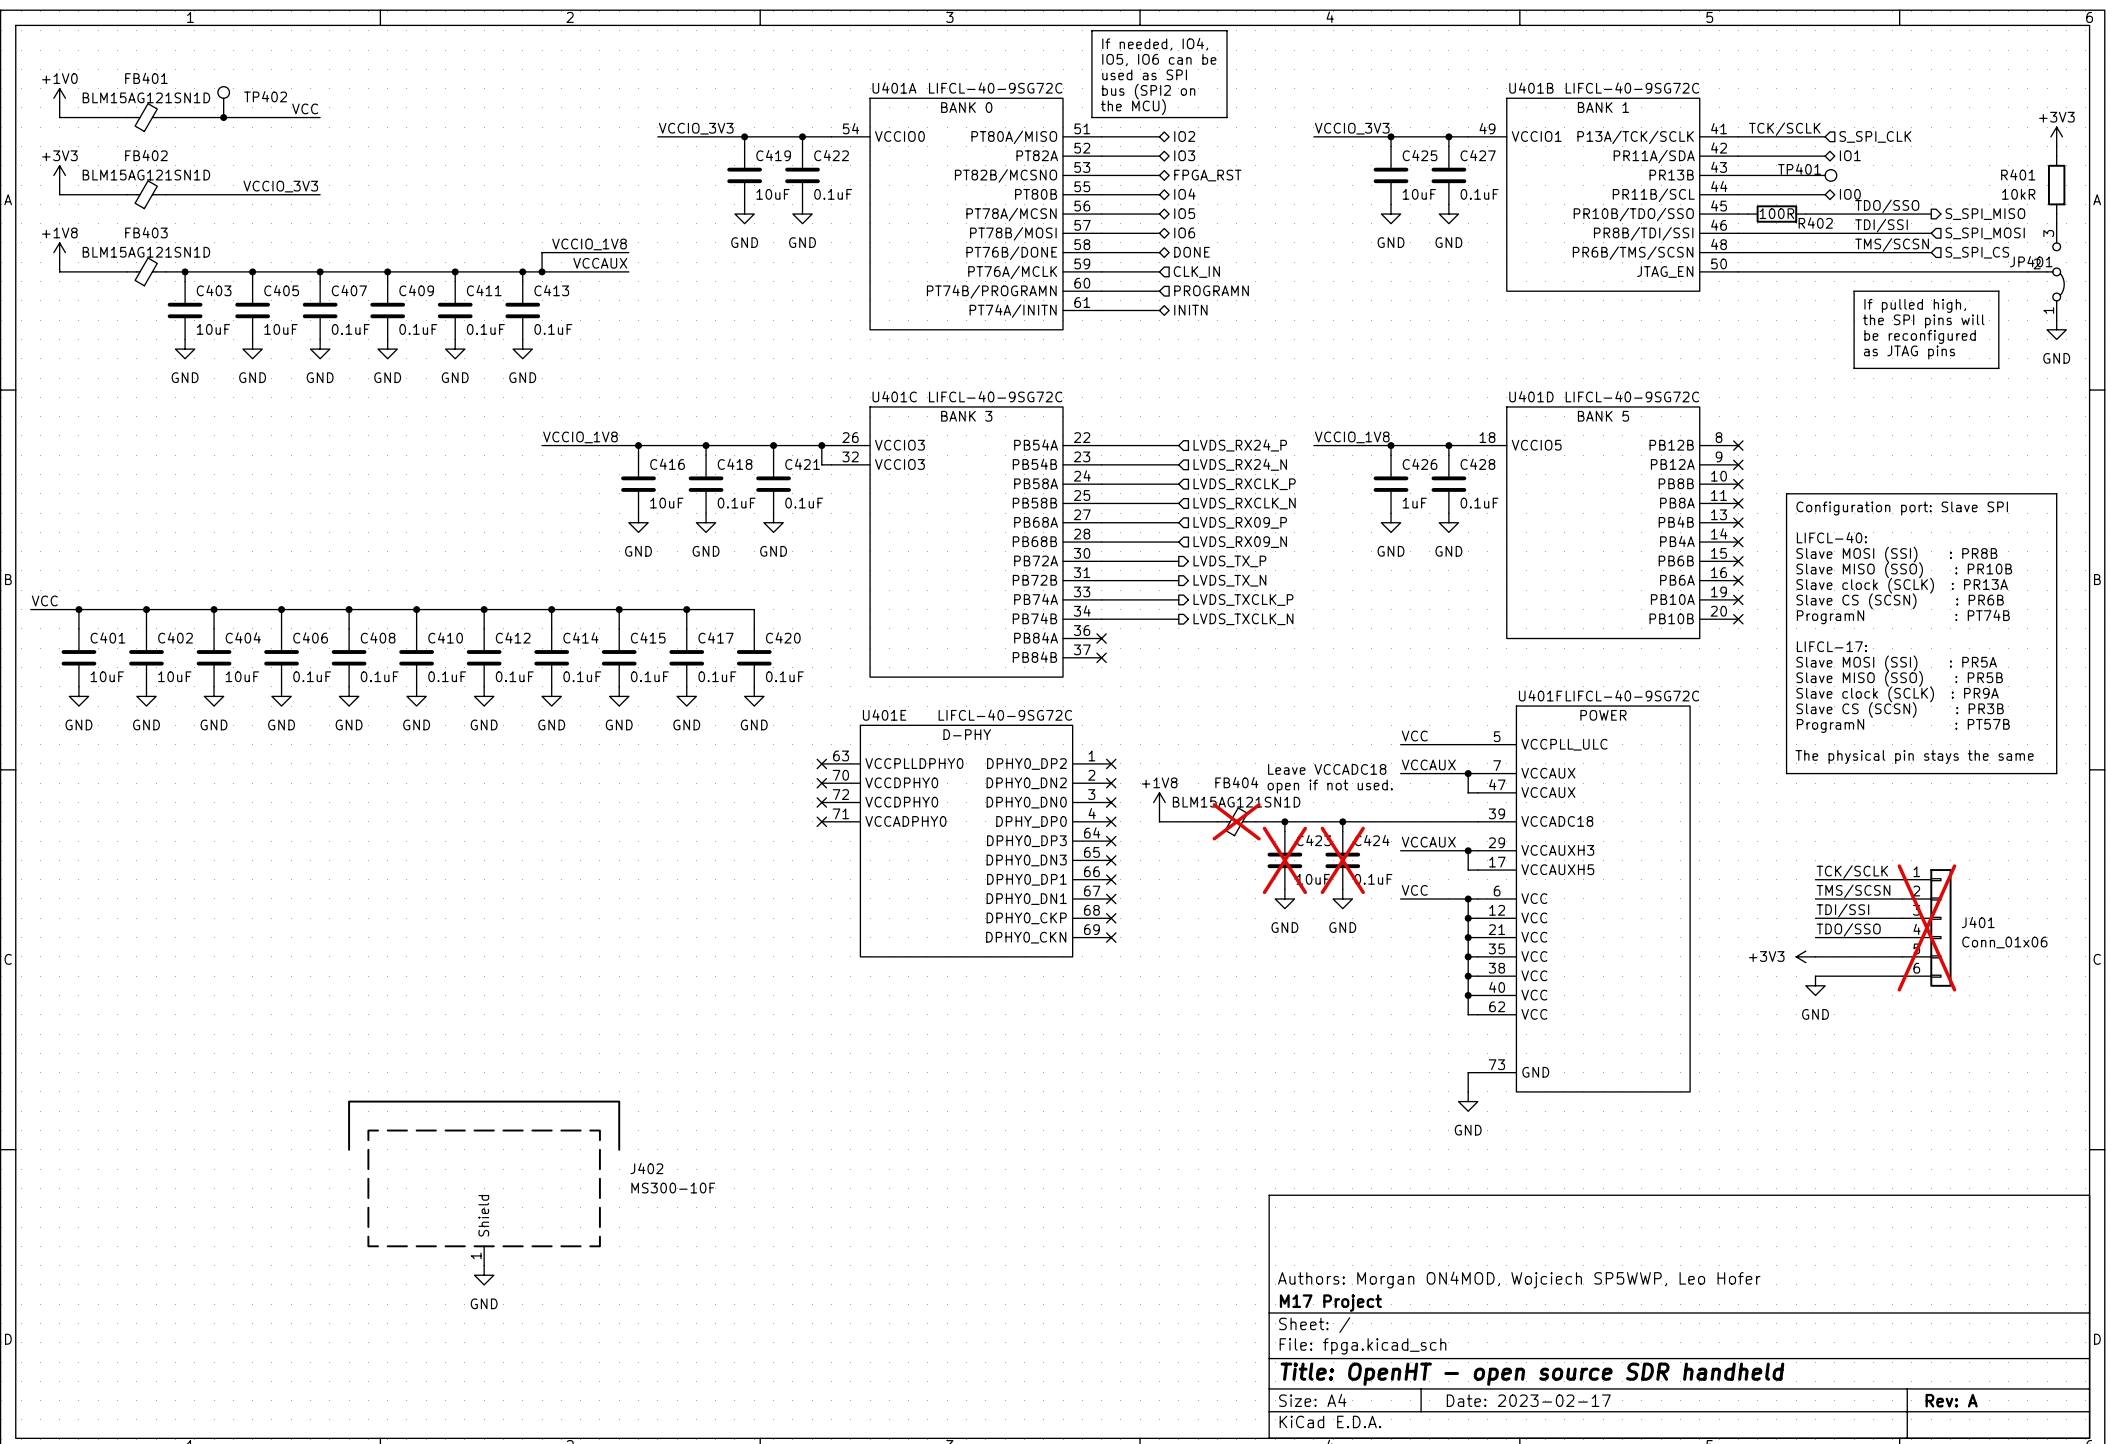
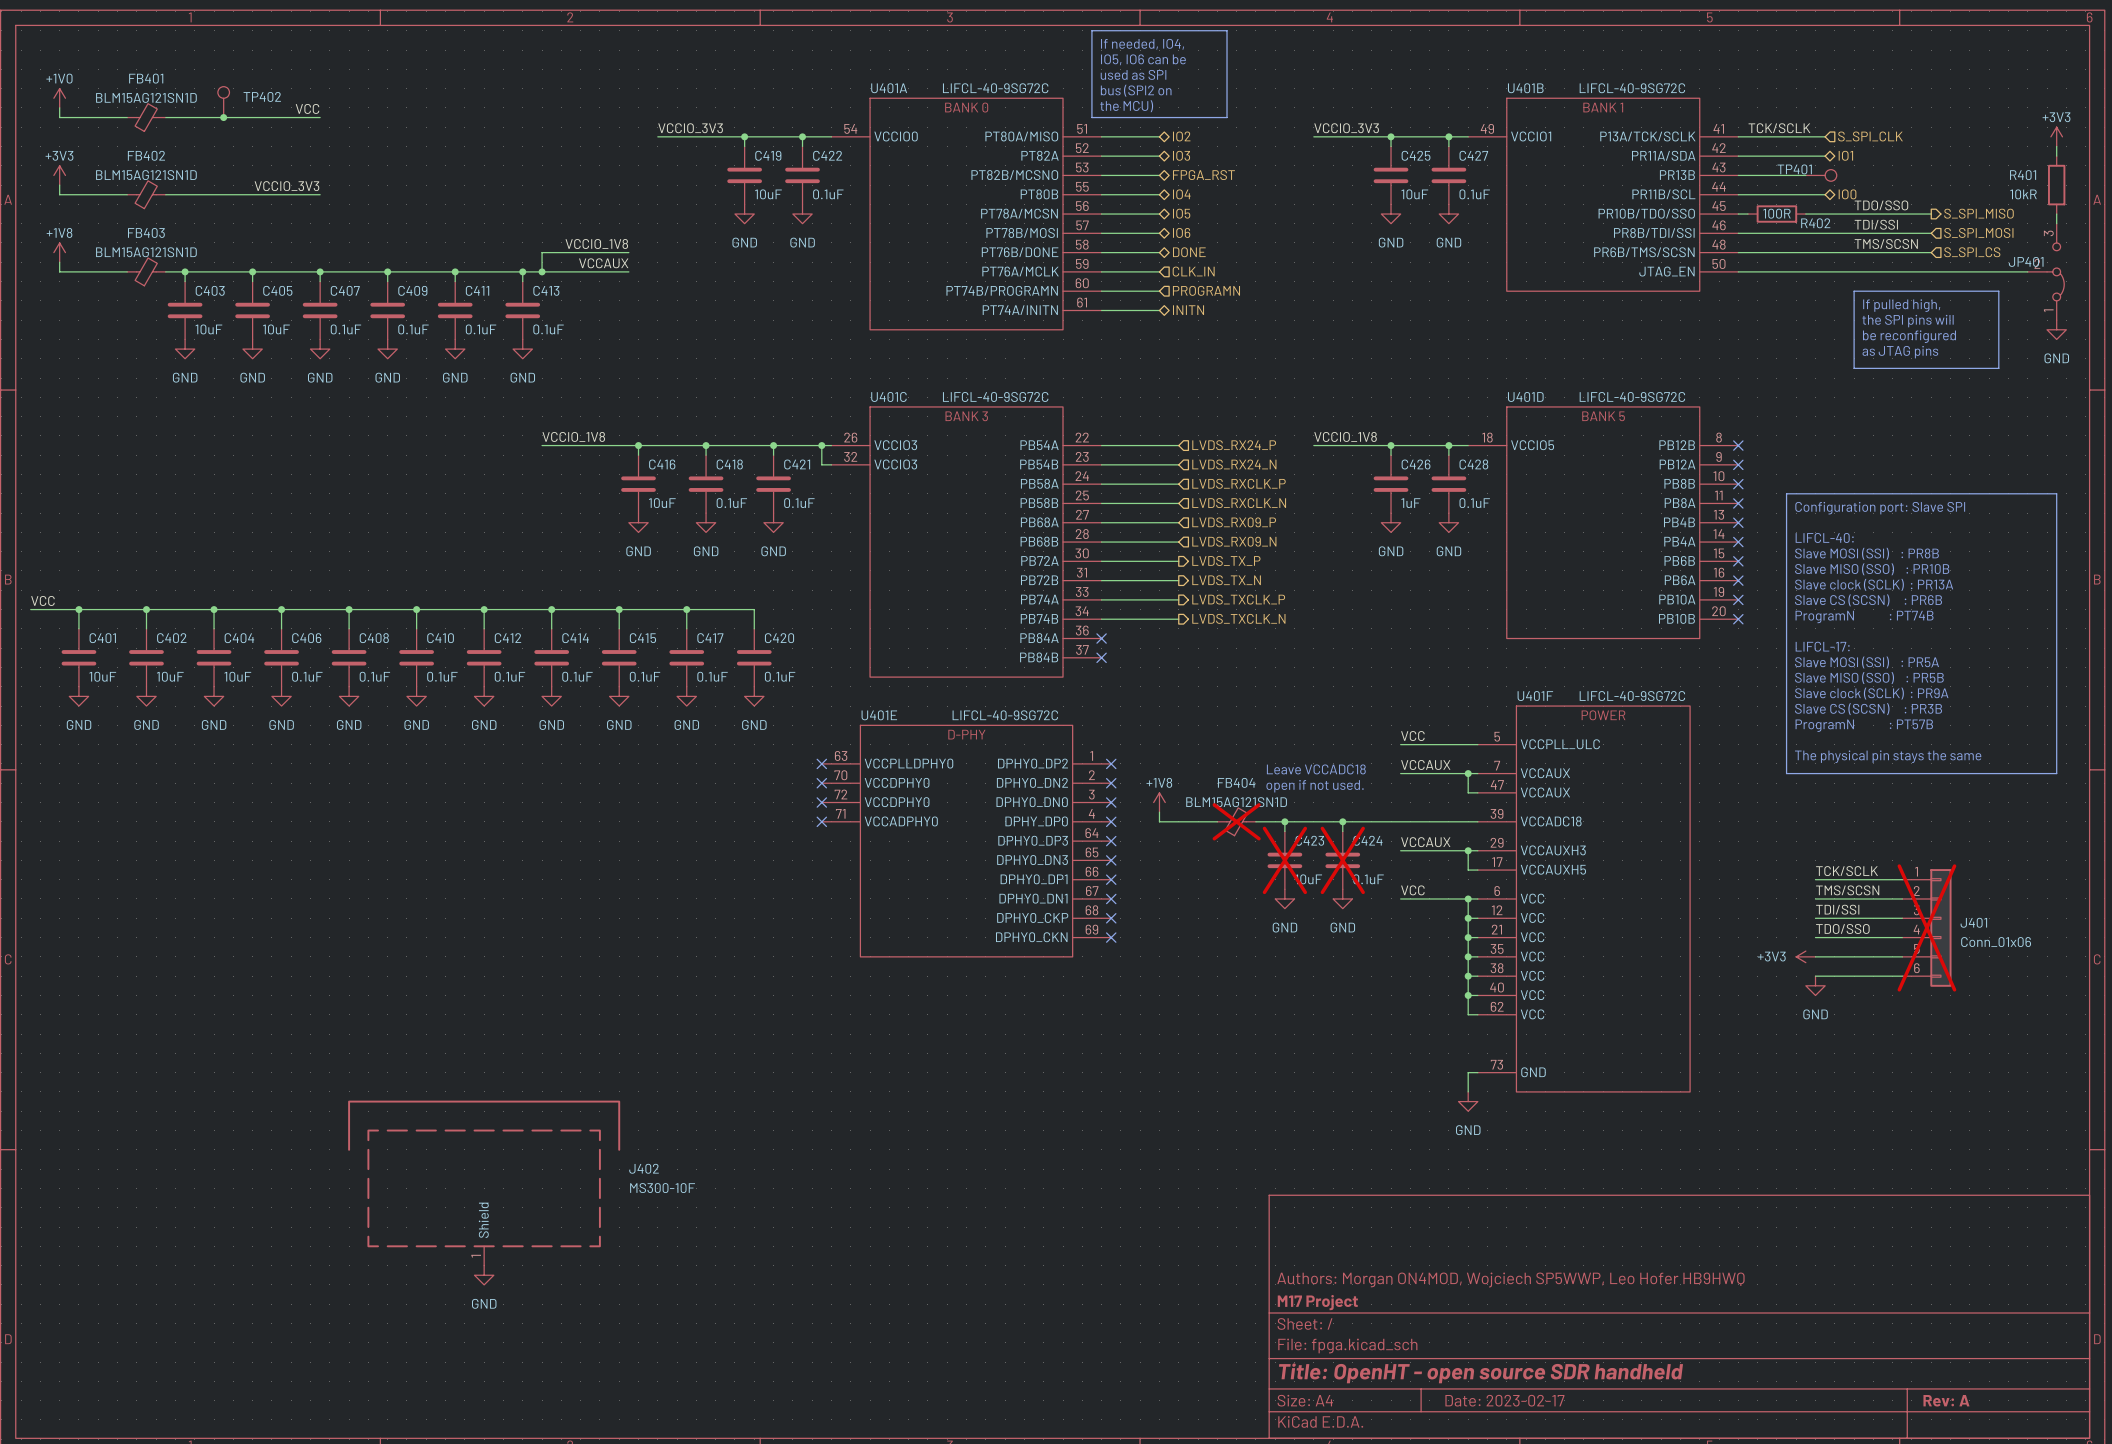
title block: Authors: Morgan ON4MOD, Wojciech SP5WWP, Leo Hofer (1519, 1280) -> Authors: Morgan ON4MOD, Wojciech SP5WWP, Leo Hofer HB9HWQ (1510, 1280)

